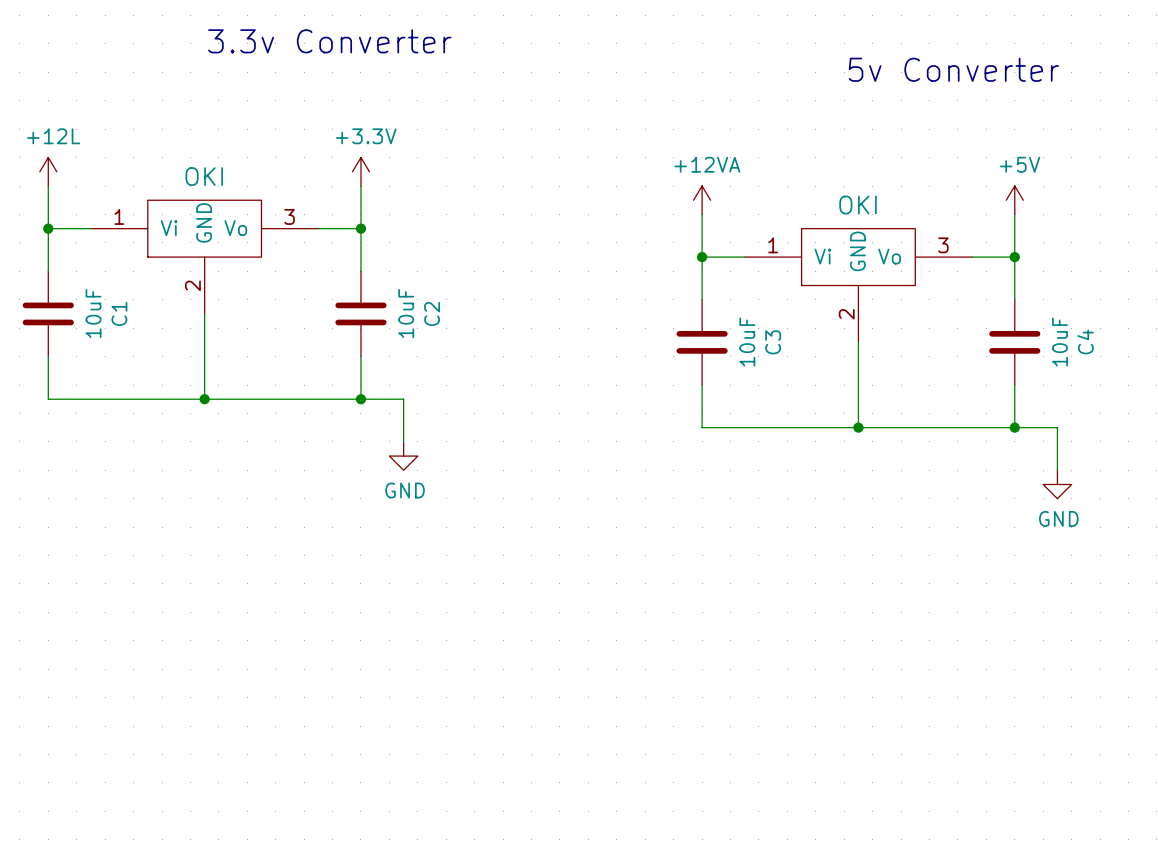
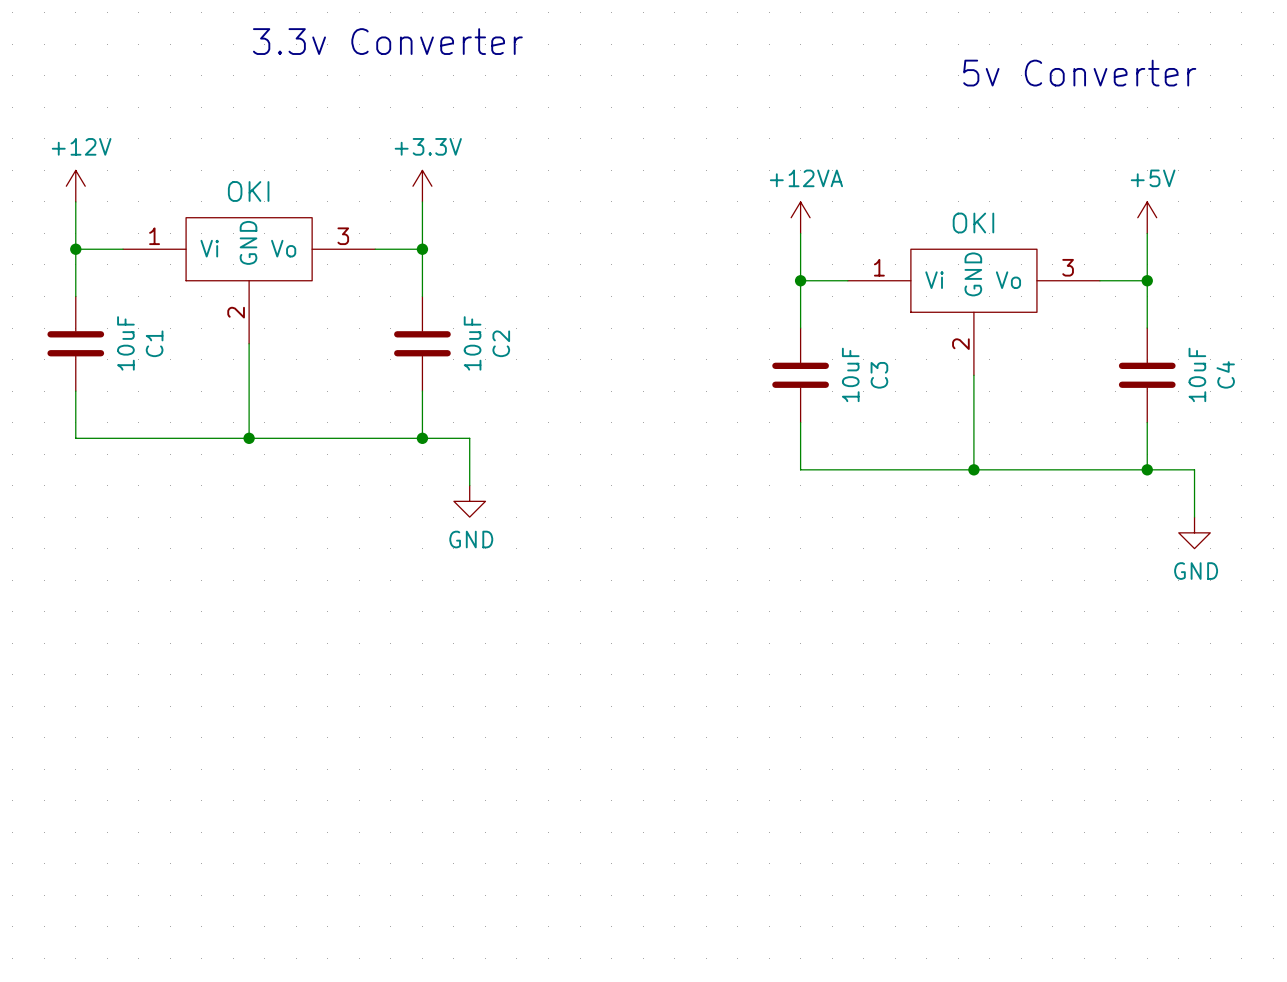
power symbol: +12L (48, 171) -> +12V (75, 186)

